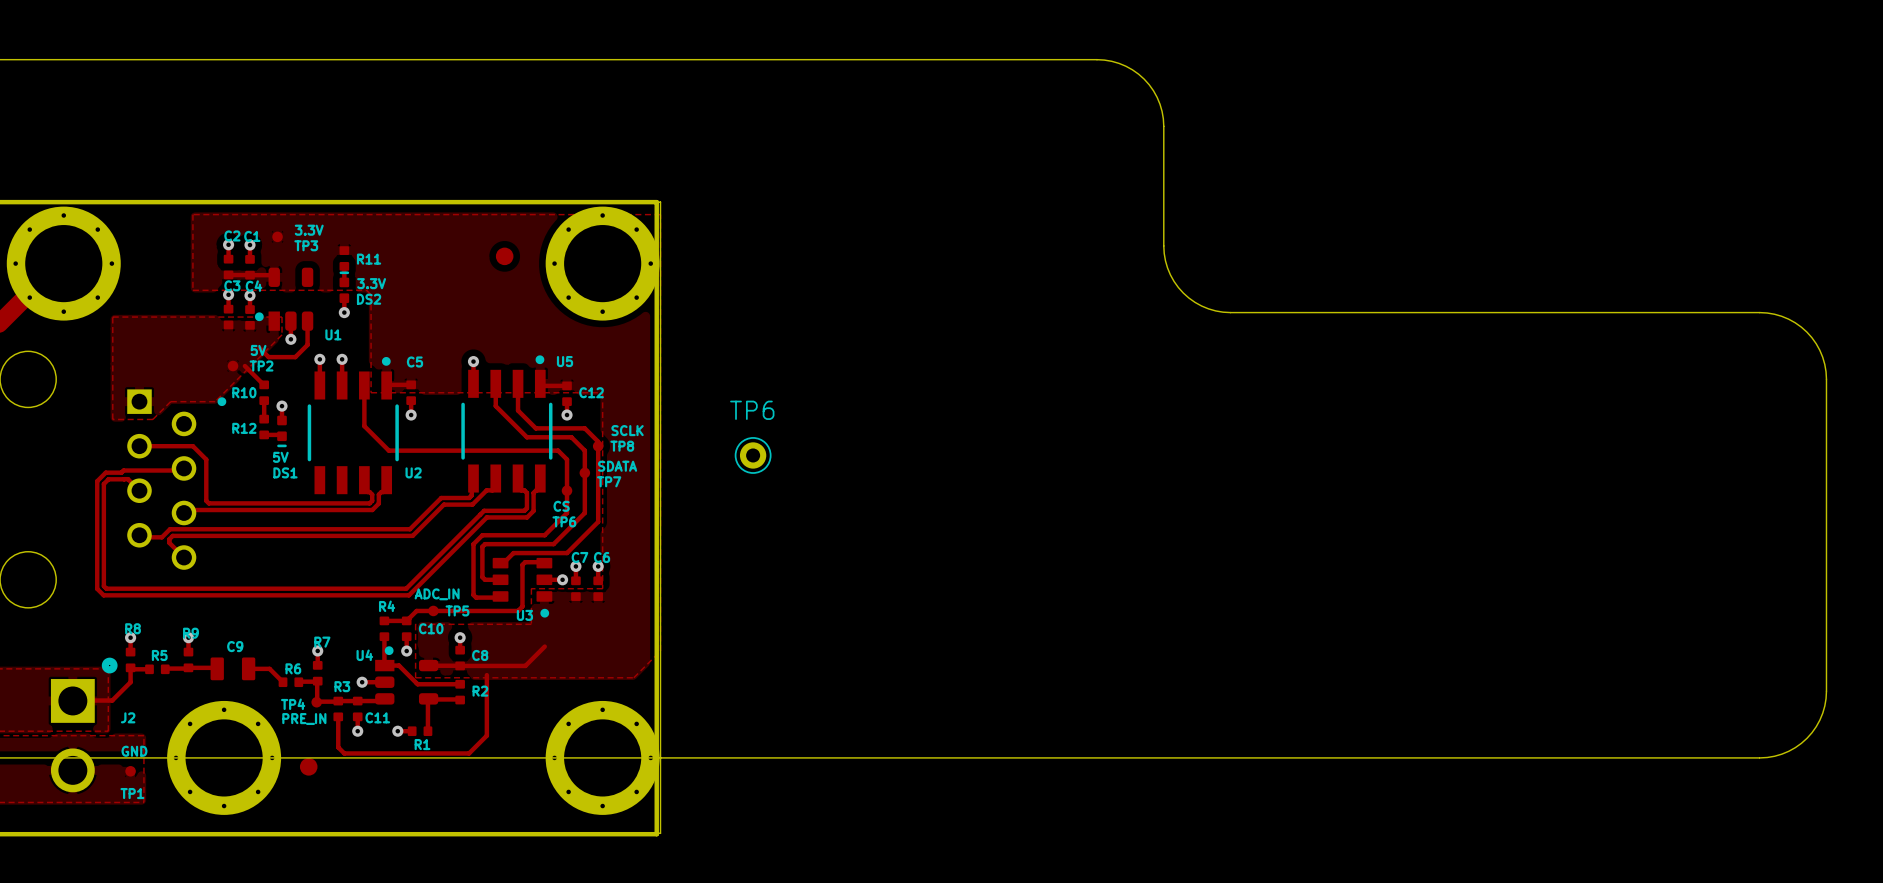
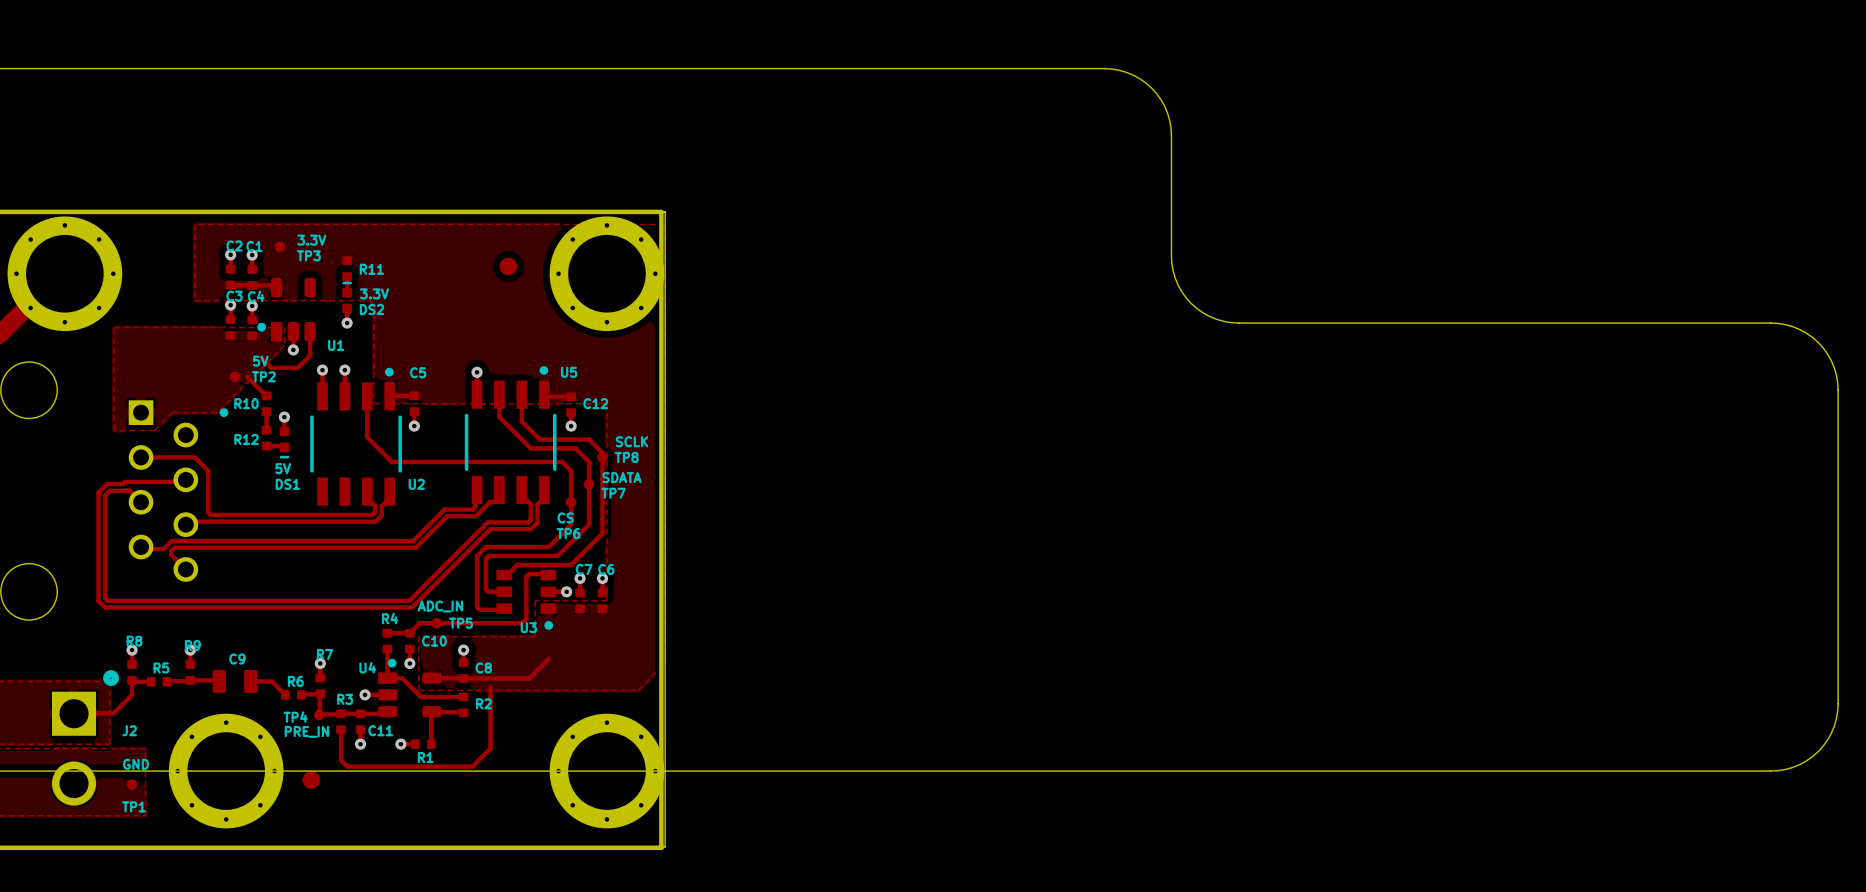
TP6: (753, 455) -> none

